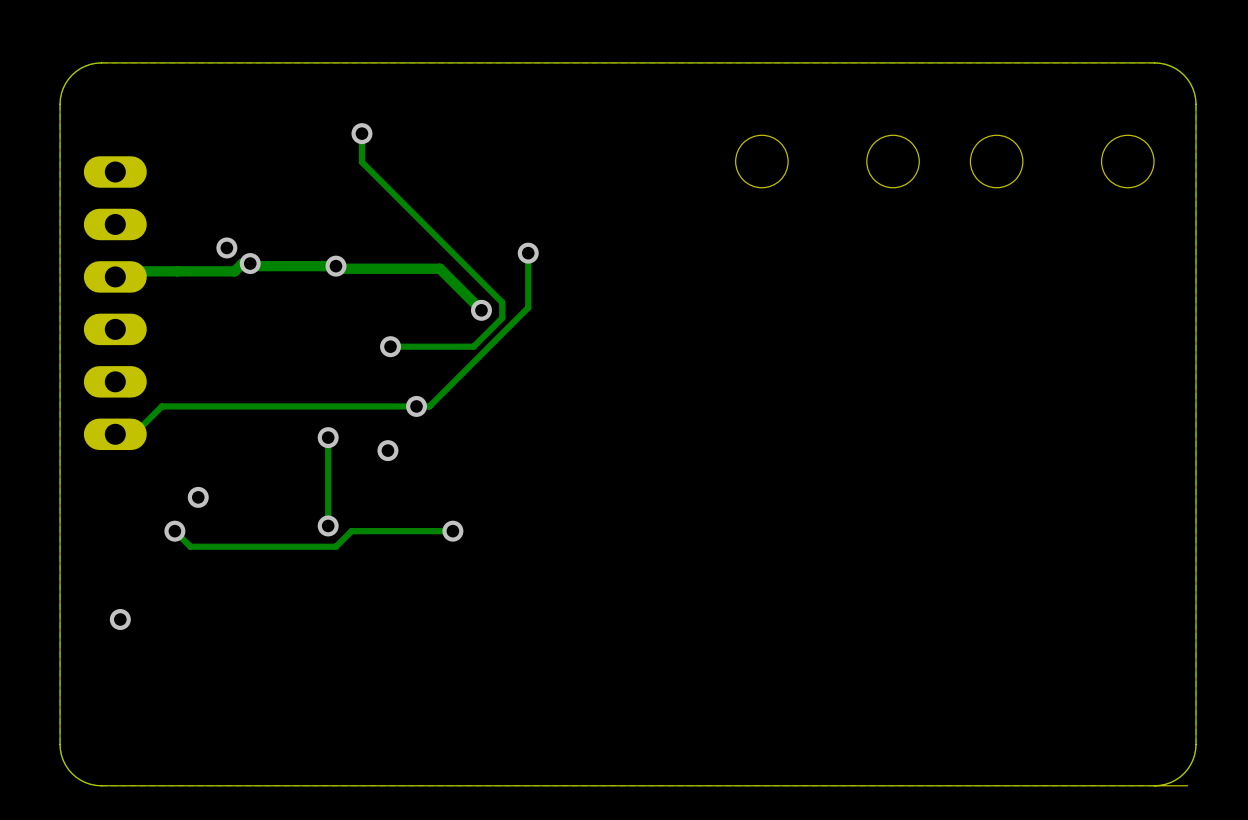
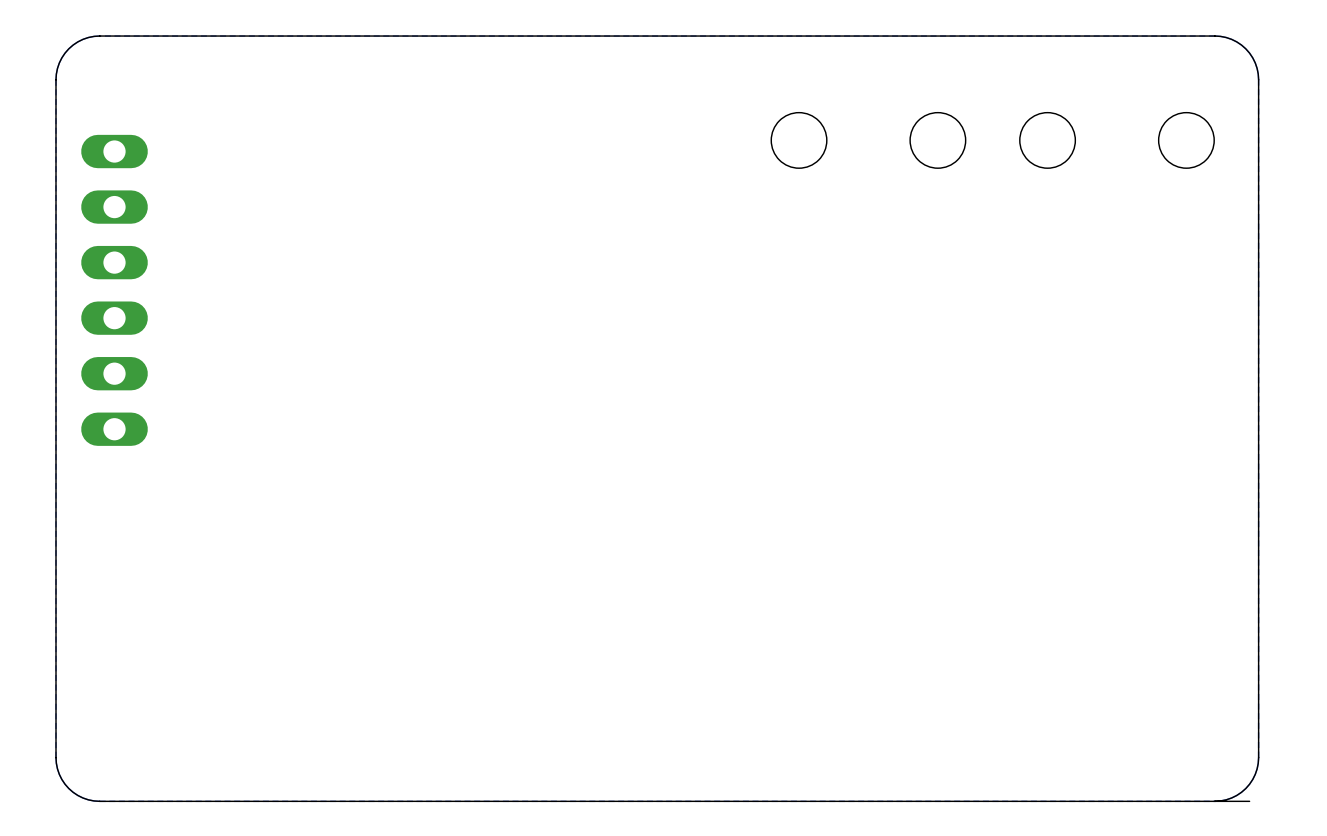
track: (361, 133) (361, 162) (502, 302) (502, 318) (473, 346) (390, 346) -> none
via: (361, 133) -> none
via: (226, 247) -> none
track: (528, 253) (528, 307) (429, 406) (161, 406) (135, 432) (117, 432) (115, 434) -> none
via: (528, 253) -> none
via: (250, 263) -> none
via: (335, 266) -> none
track: (115, 276) (120, 271) (234, 271) (242, 263) (250, 263) (252, 266) (335, 266) (338, 268) (439, 268) (481, 310) -> none
via: (481, 310) -> none
via: (390, 346) -> none
via: (416, 406) -> none
track: (328, 437) (328, 525) -> none
via: (328, 437) -> none
via: (387, 450) -> none
via: (198, 497) -> none
via: (328, 525) -> none
via: (174, 531) -> none
track: (452, 531) (351, 531) (335, 546) (190, 546) (174, 531) -> none
via: (452, 531) -> none
via: (120, 619) -> none

